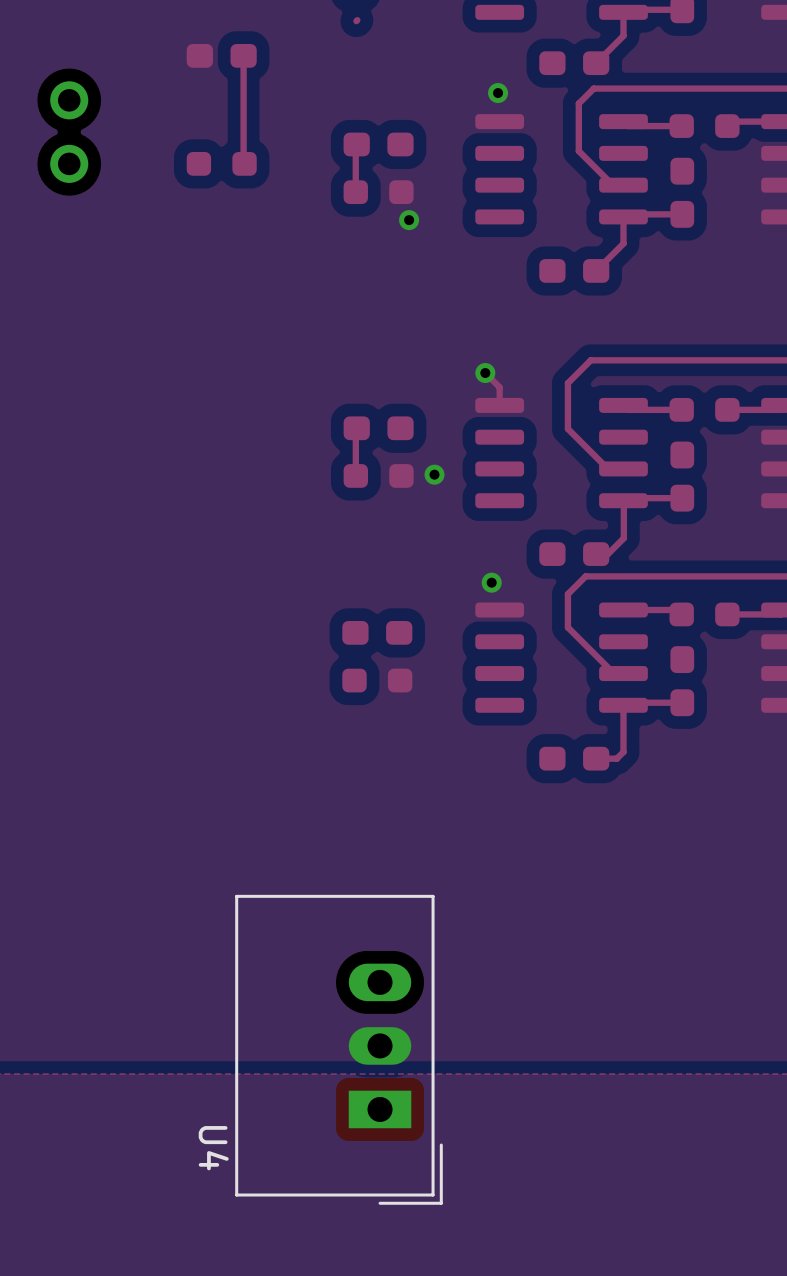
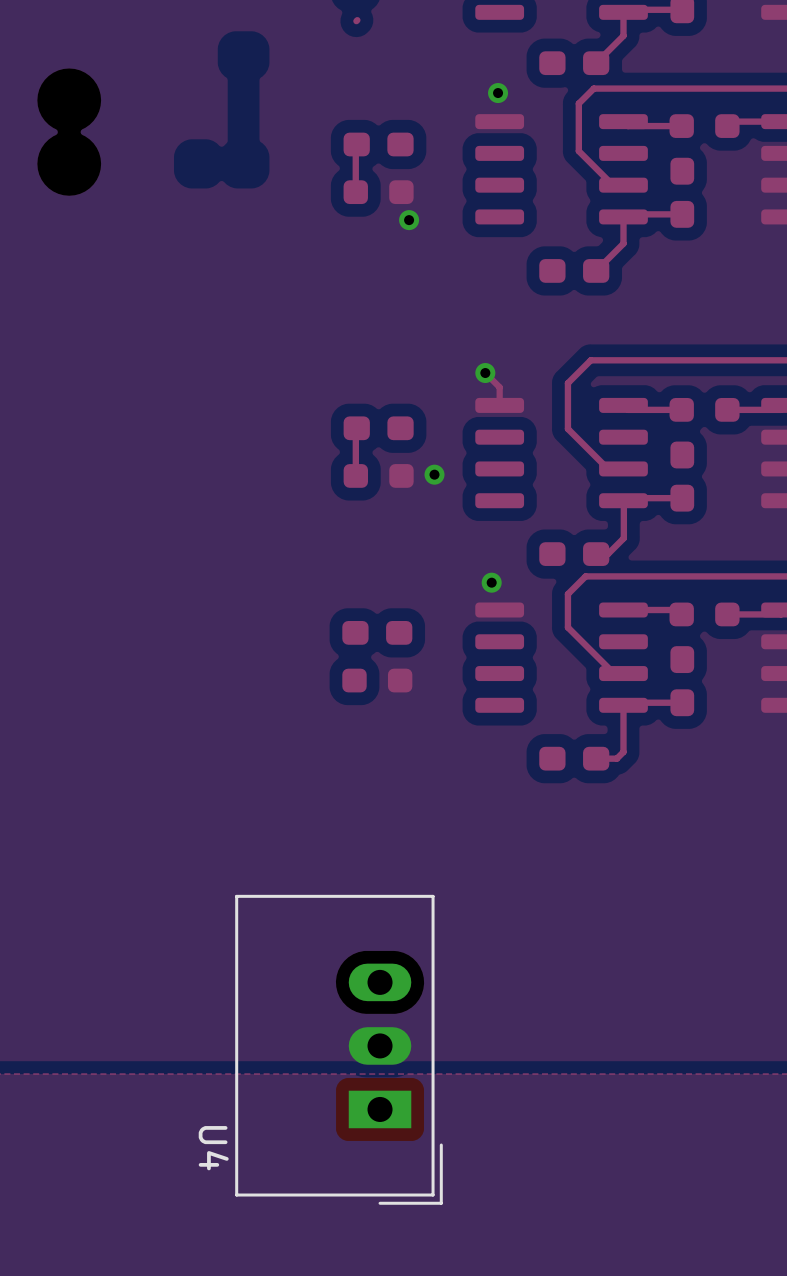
part: (221, 55) -> none
top track: (243, 55) (244, 163) -> none
part: (69, 132) -> none
part: (221, 163) -> none

